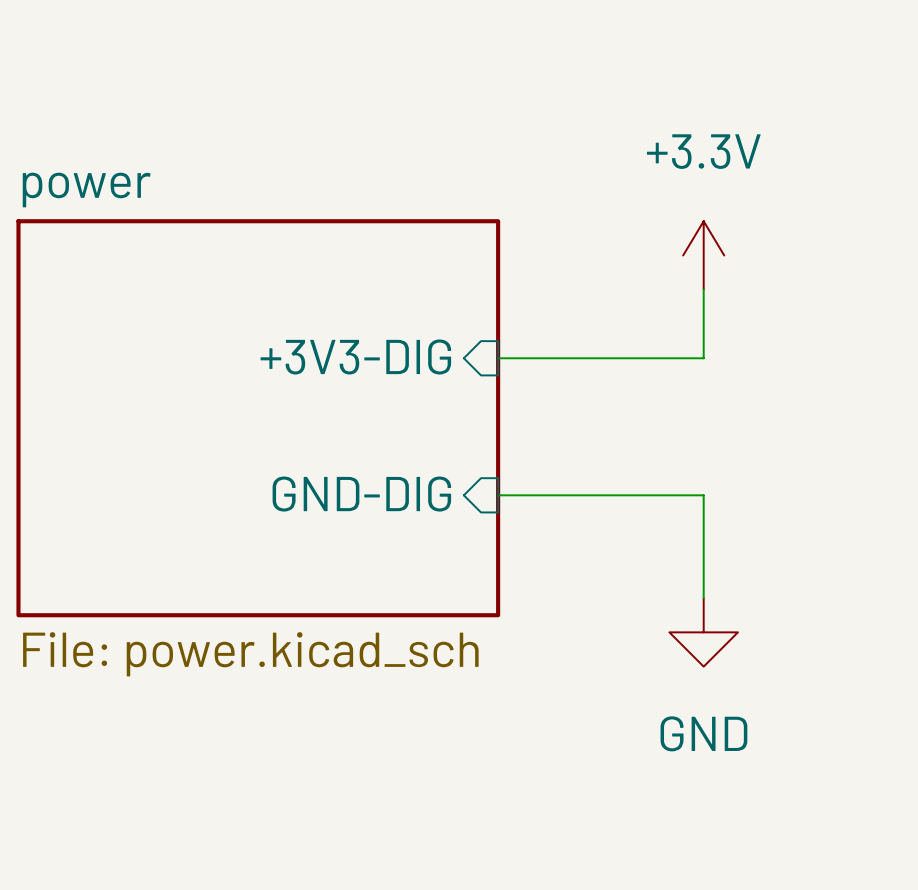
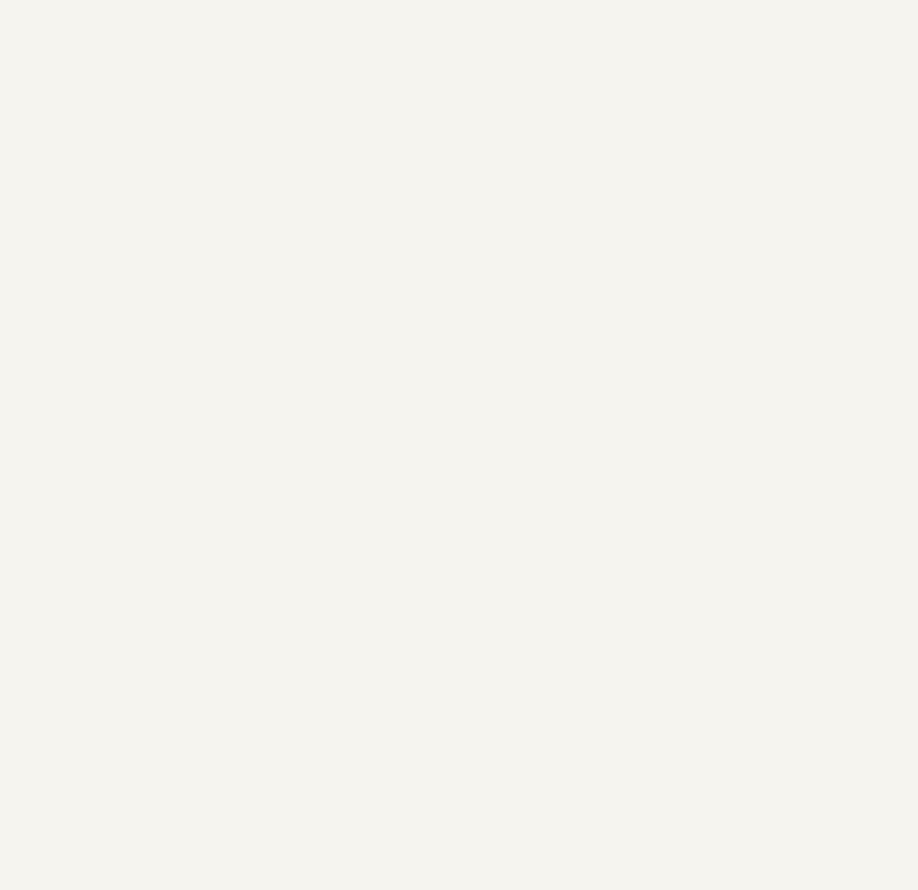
power symbol: +3.3V (703, 255) -> none
wire: (703, 289) (703, 358) (498, 358) -> none
sheet pin: +3V3-DIG (355, 356) -> none
sheet power: File: power.kicad_sch (258, 418) -> none
sheet pin: GND-DIG (361, 494) -> none
wire: (498, 495) (703, 495) (703, 598) -> none
power symbol: GND (703, 632) -> none

